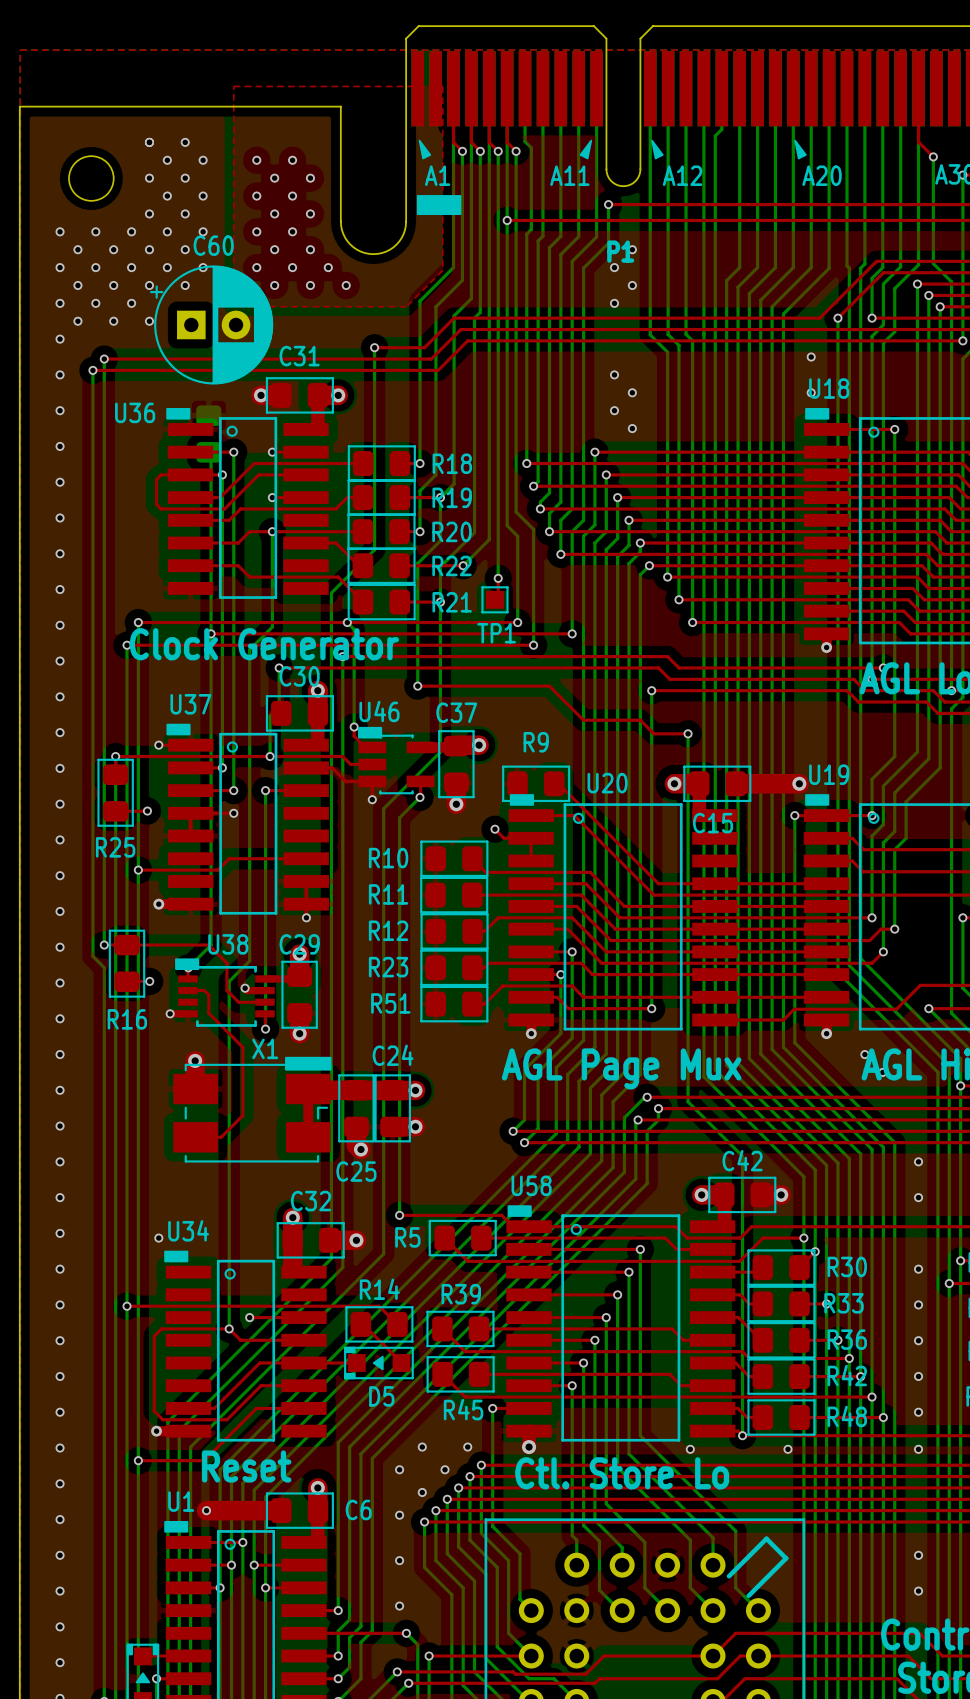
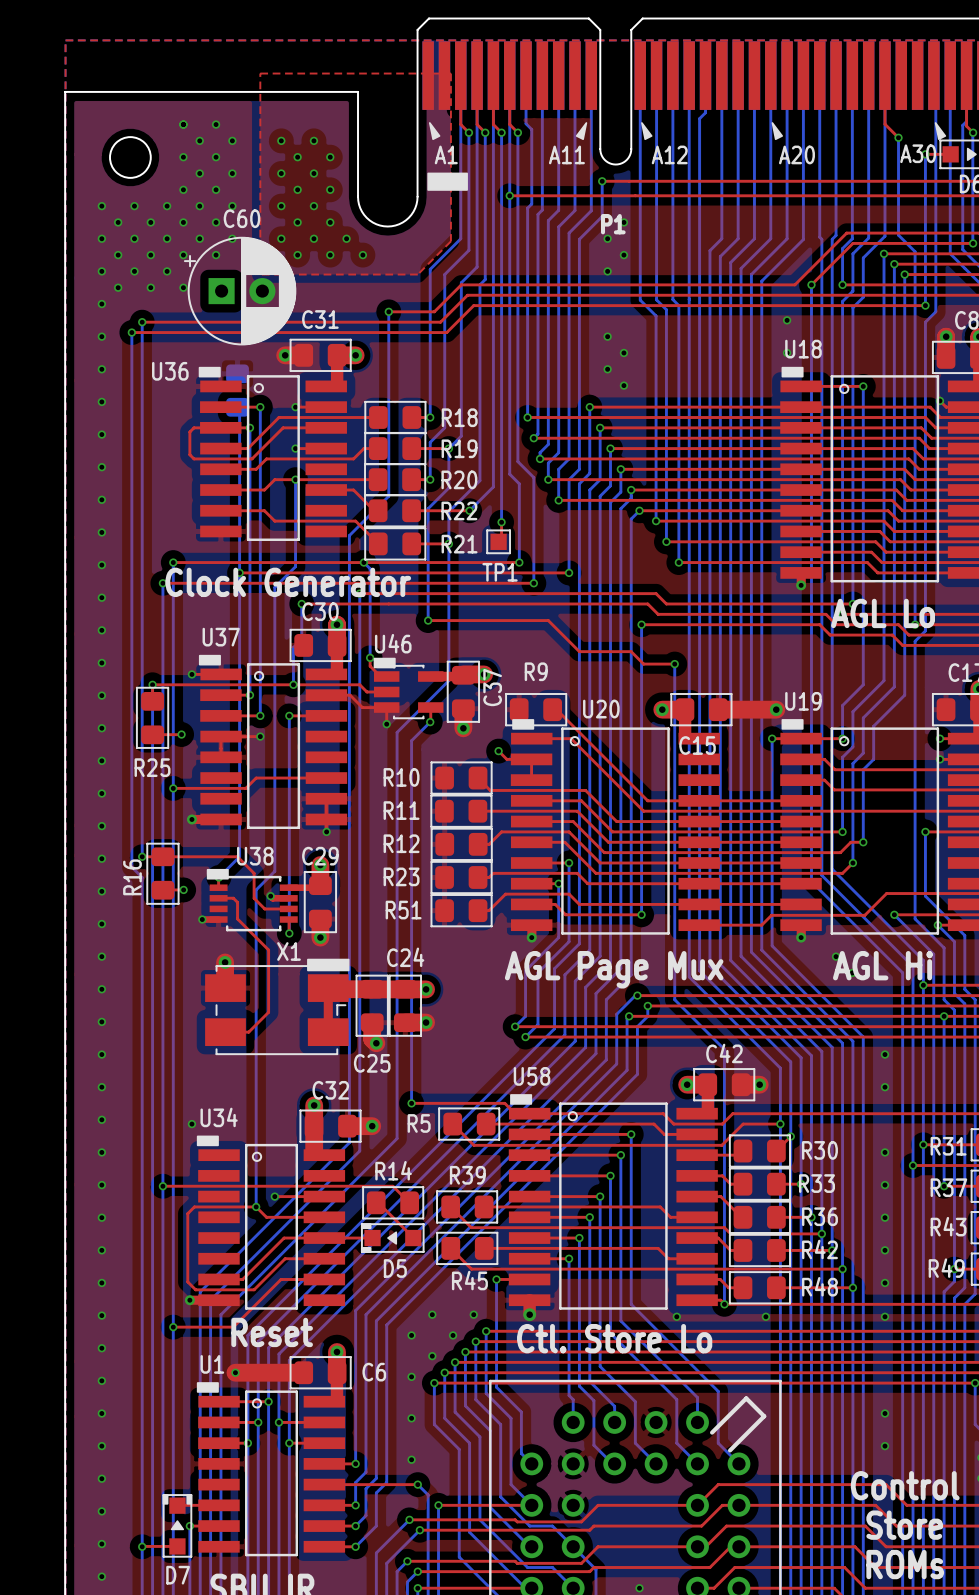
C37 name rotation: 0° (456, 712) -> 90° counterclockwise (492, 687)
C37 name position: C37 (456, 712) -> C37 (492, 687)
R16 name rotation: 0° (127, 1019) -> 90° counterclockwise (132, 877)
R16 name position: R16 (127, 1019) -> R16 (132, 877)

